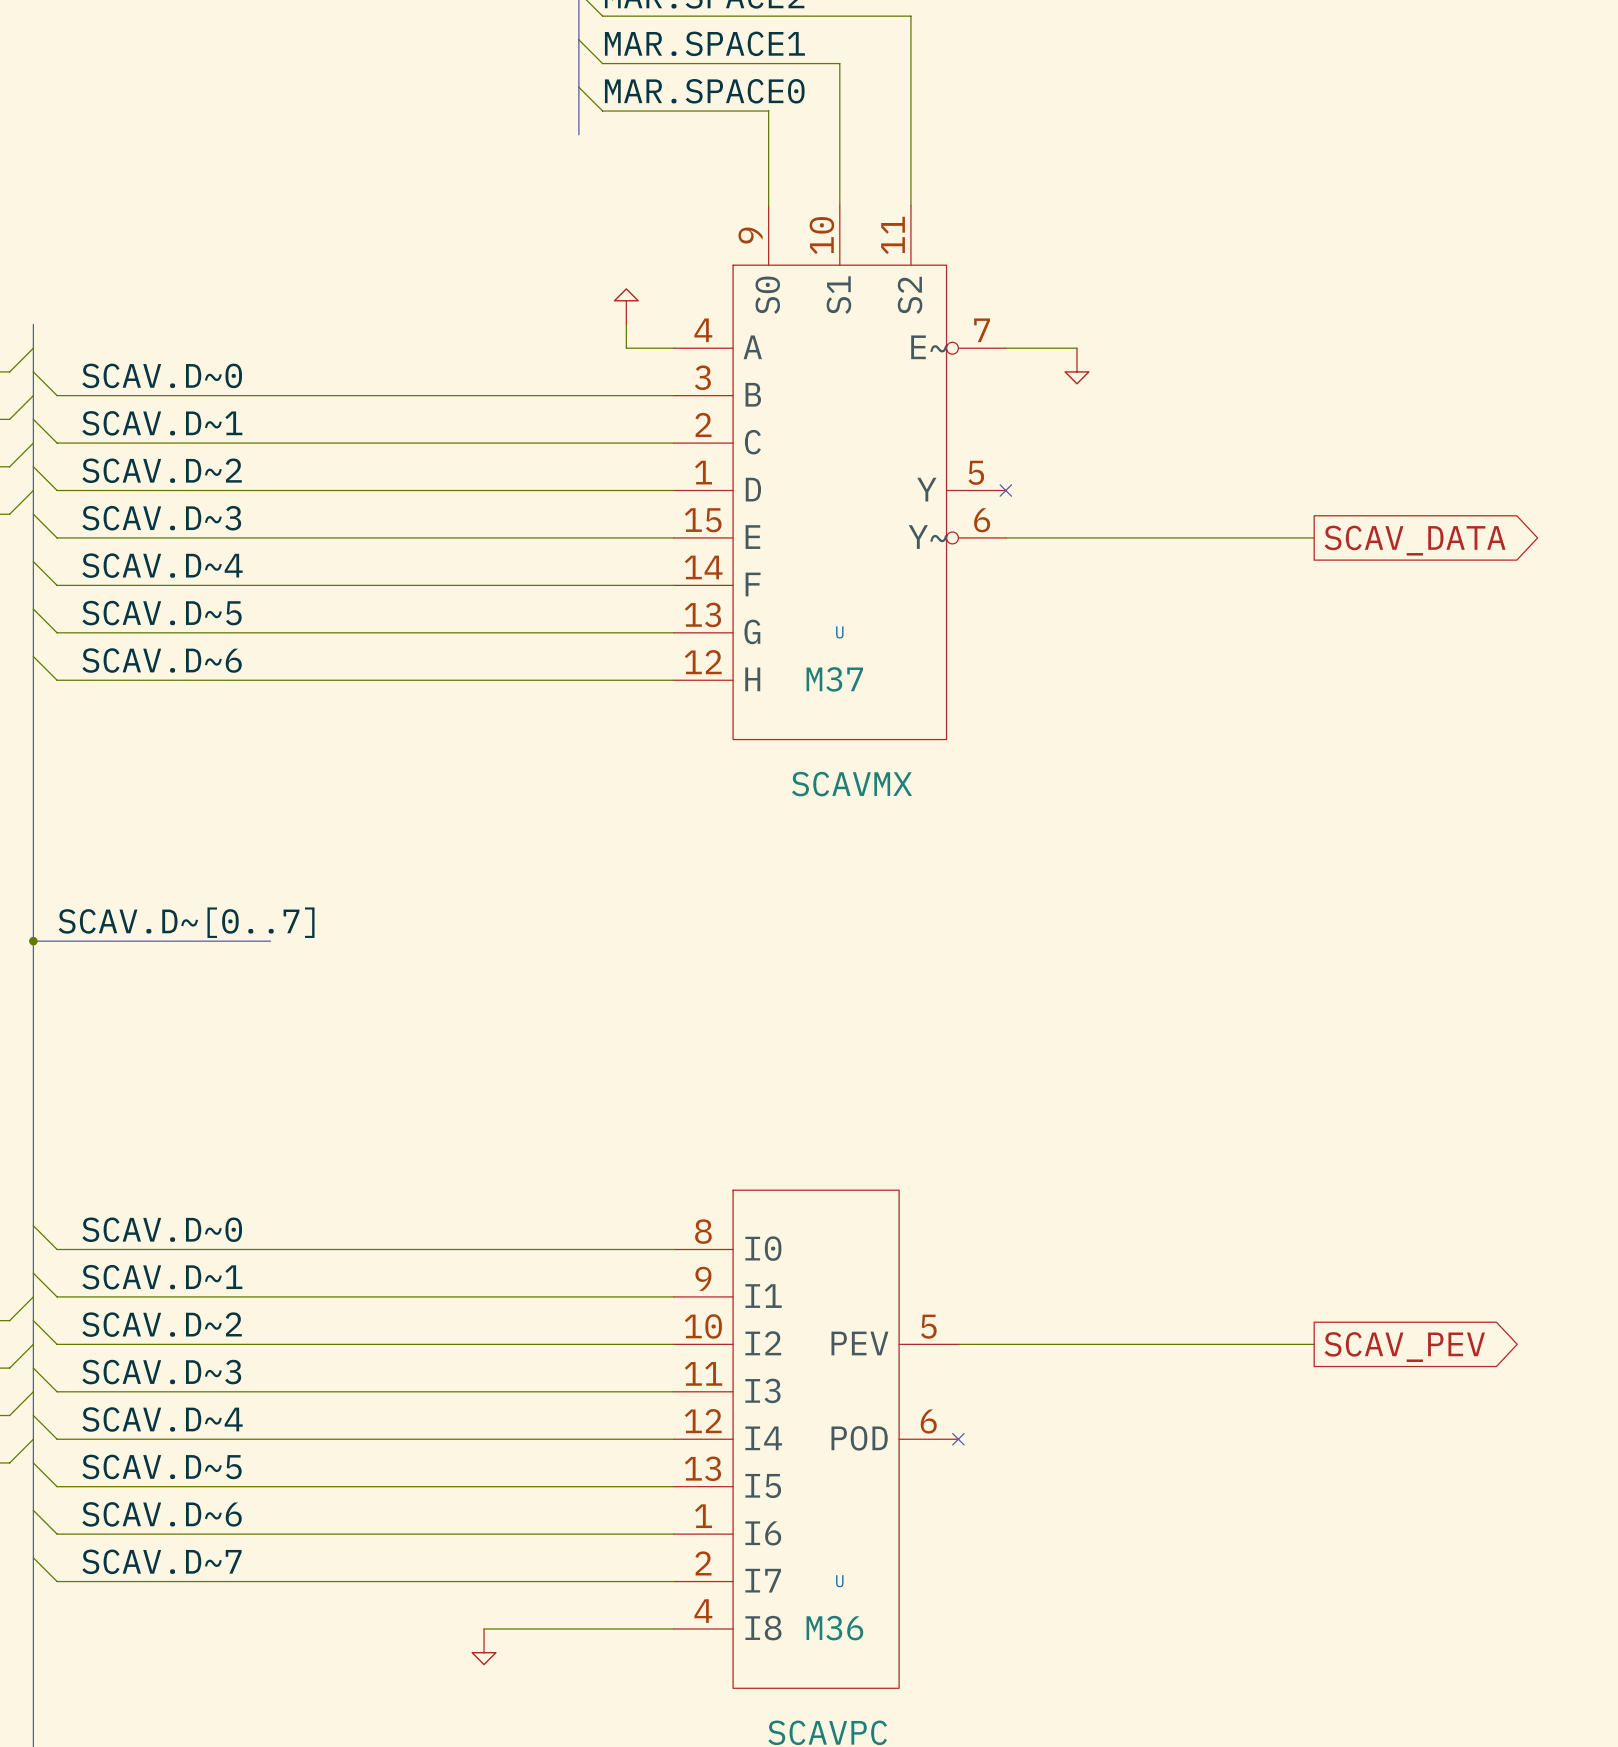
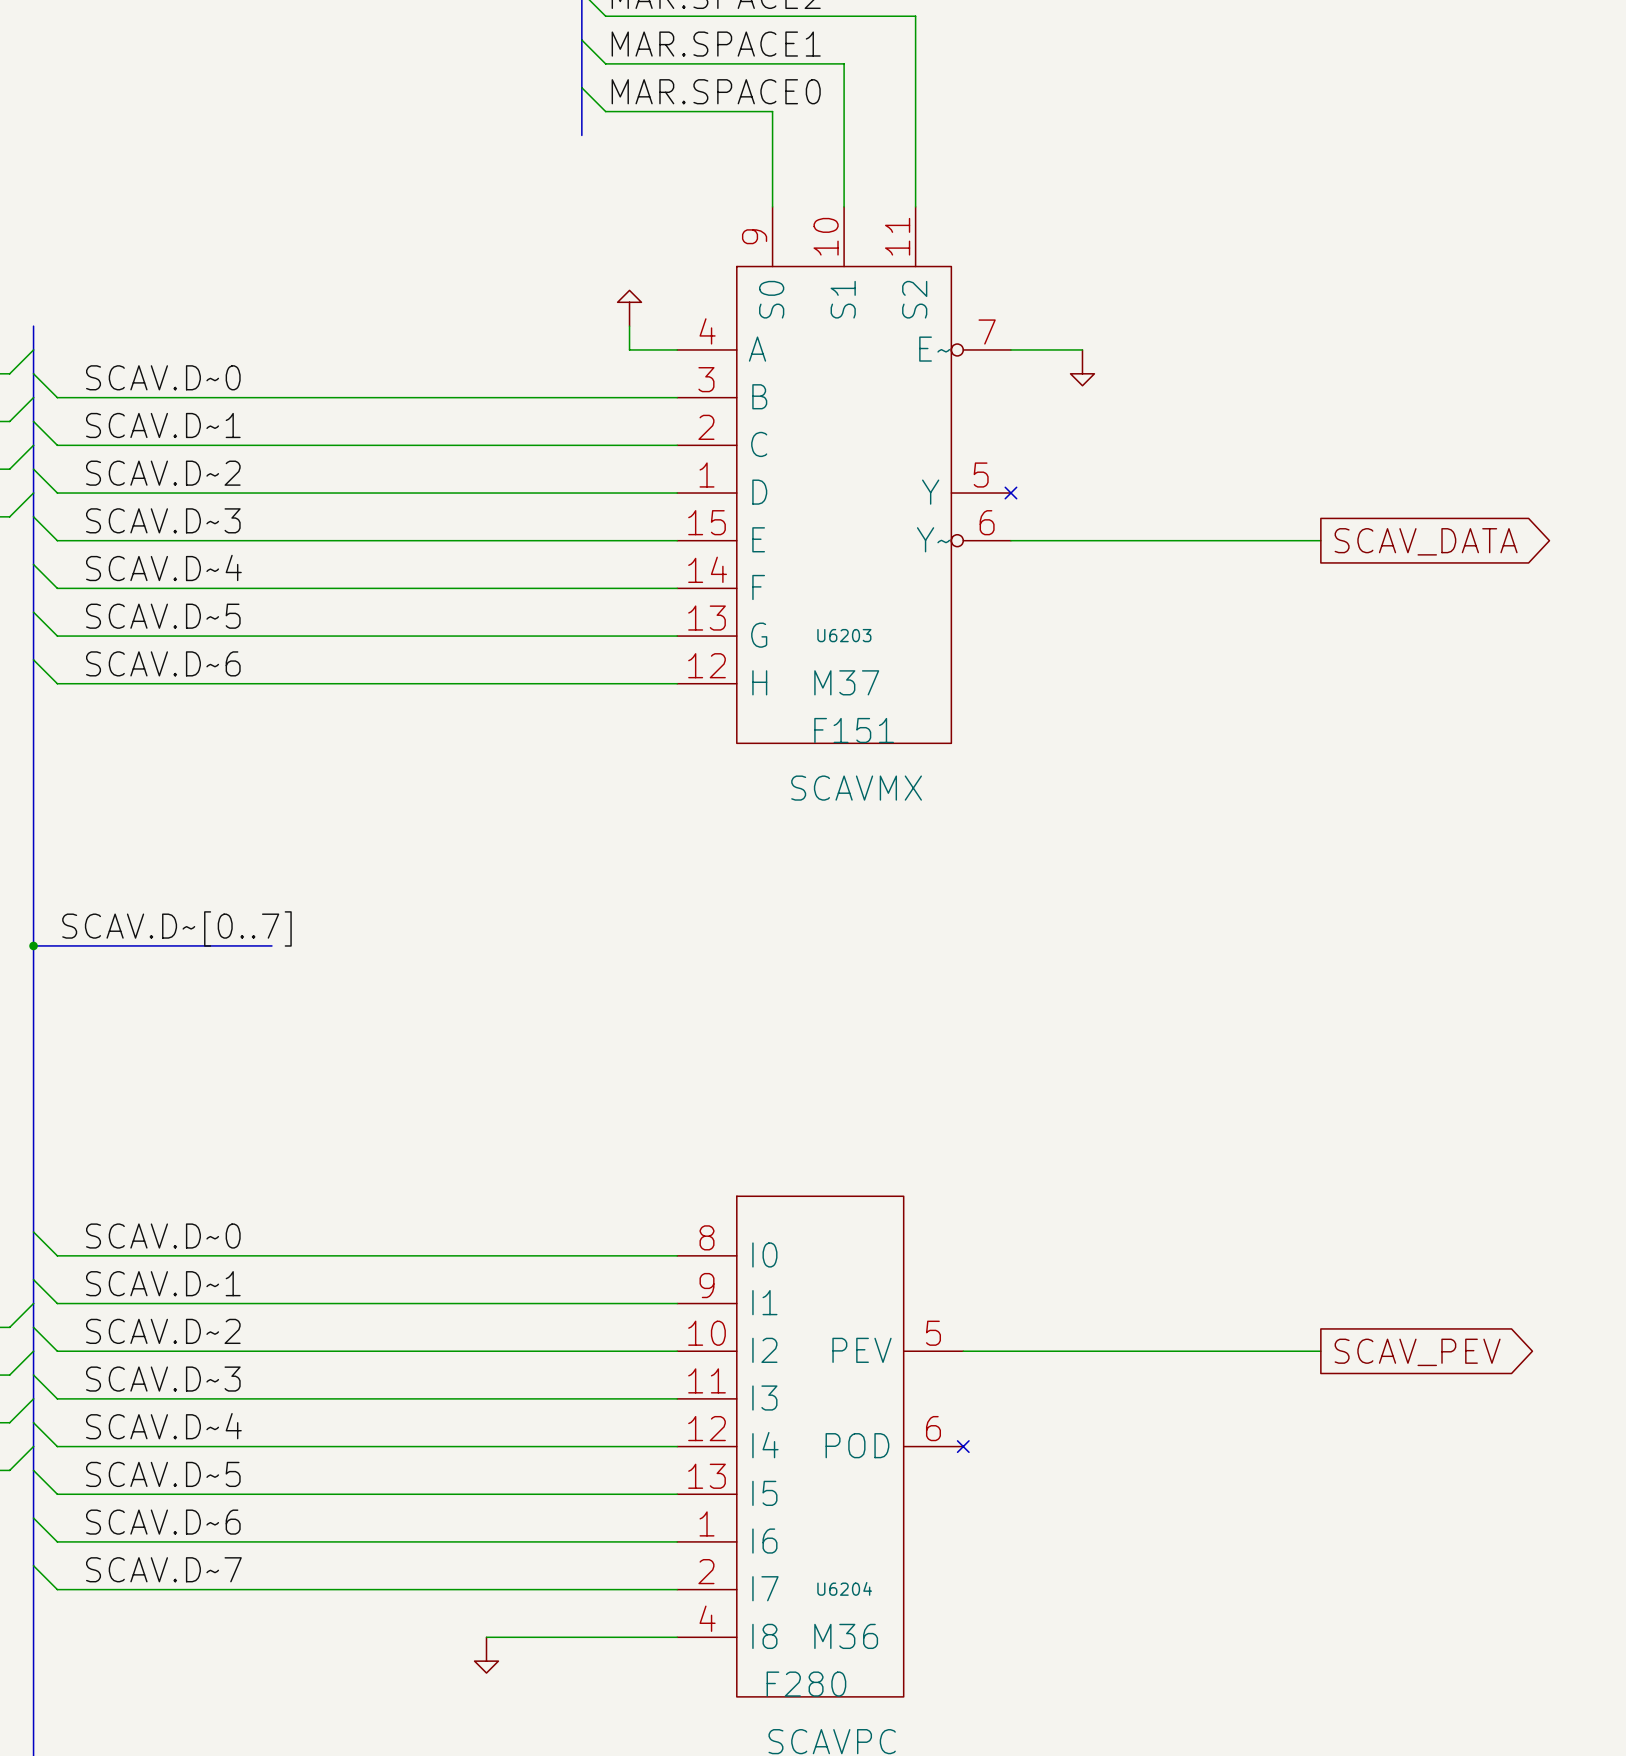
U name: U (839, 632) -> U6203 (844, 635)
U value: none -> F151 (854, 730)
U name: U (839, 1581) -> U6204 (844, 1588)
U value: none -> F280 (806, 1684)

